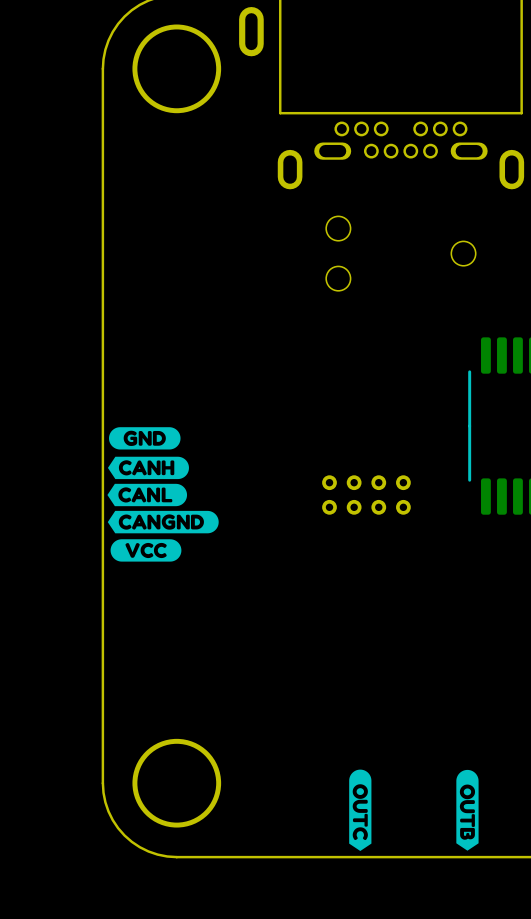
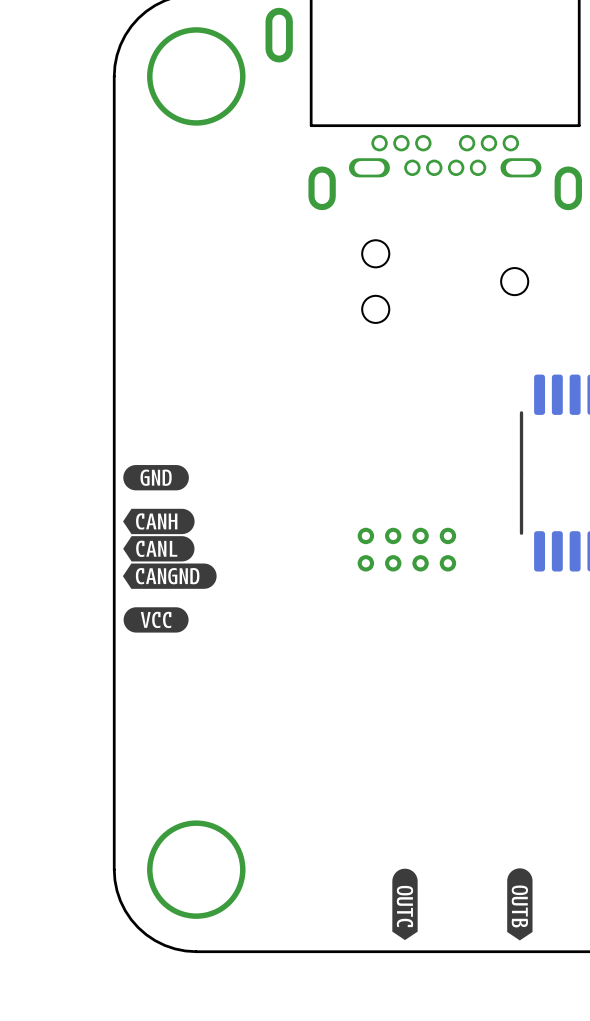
drawing shape: [108, 427, 181, 450] -> [123, 465, 189, 491]
drawing shape: [107, 456, 189, 480] -> [123, 508, 195, 535]
drawing shape: [107, 483, 188, 507] -> [123, 536, 195, 562]
drawing shape: [107, 510, 219, 534] -> [122, 563, 217, 589]
drawing shape: [110, 539, 182, 562] -> [123, 607, 189, 633]
drawing shape: [349, 769, 372, 852] -> [392, 868, 418, 941]
drawing shape: [456, 769, 479, 851] -> [507, 868, 533, 941]

